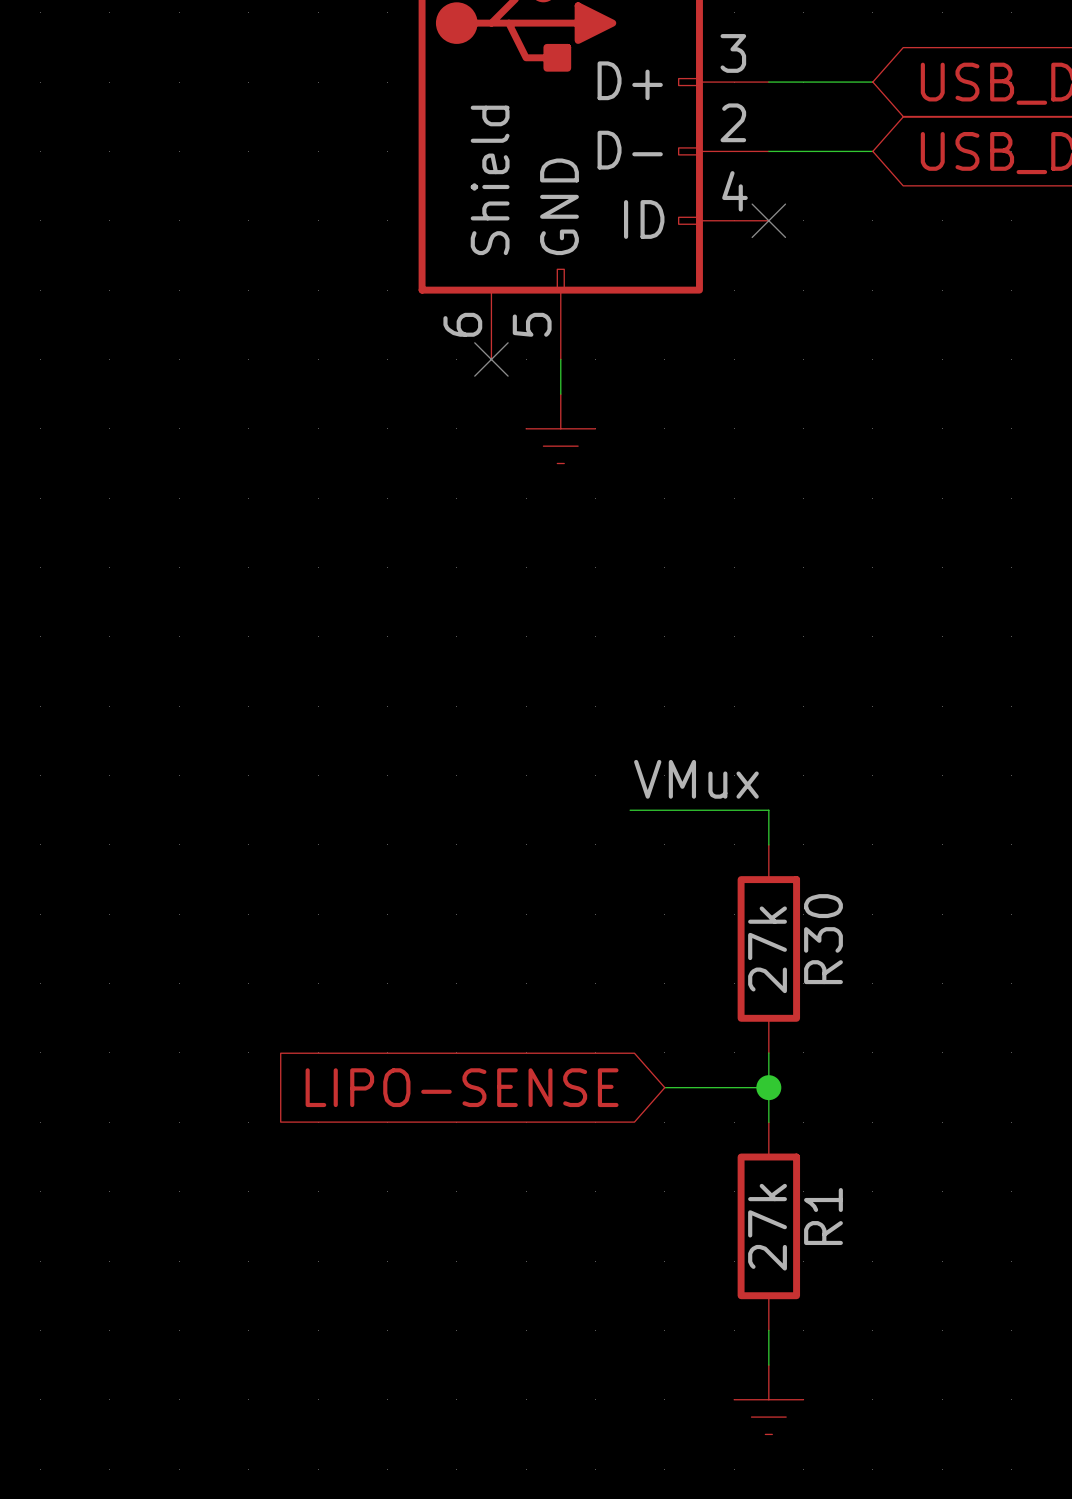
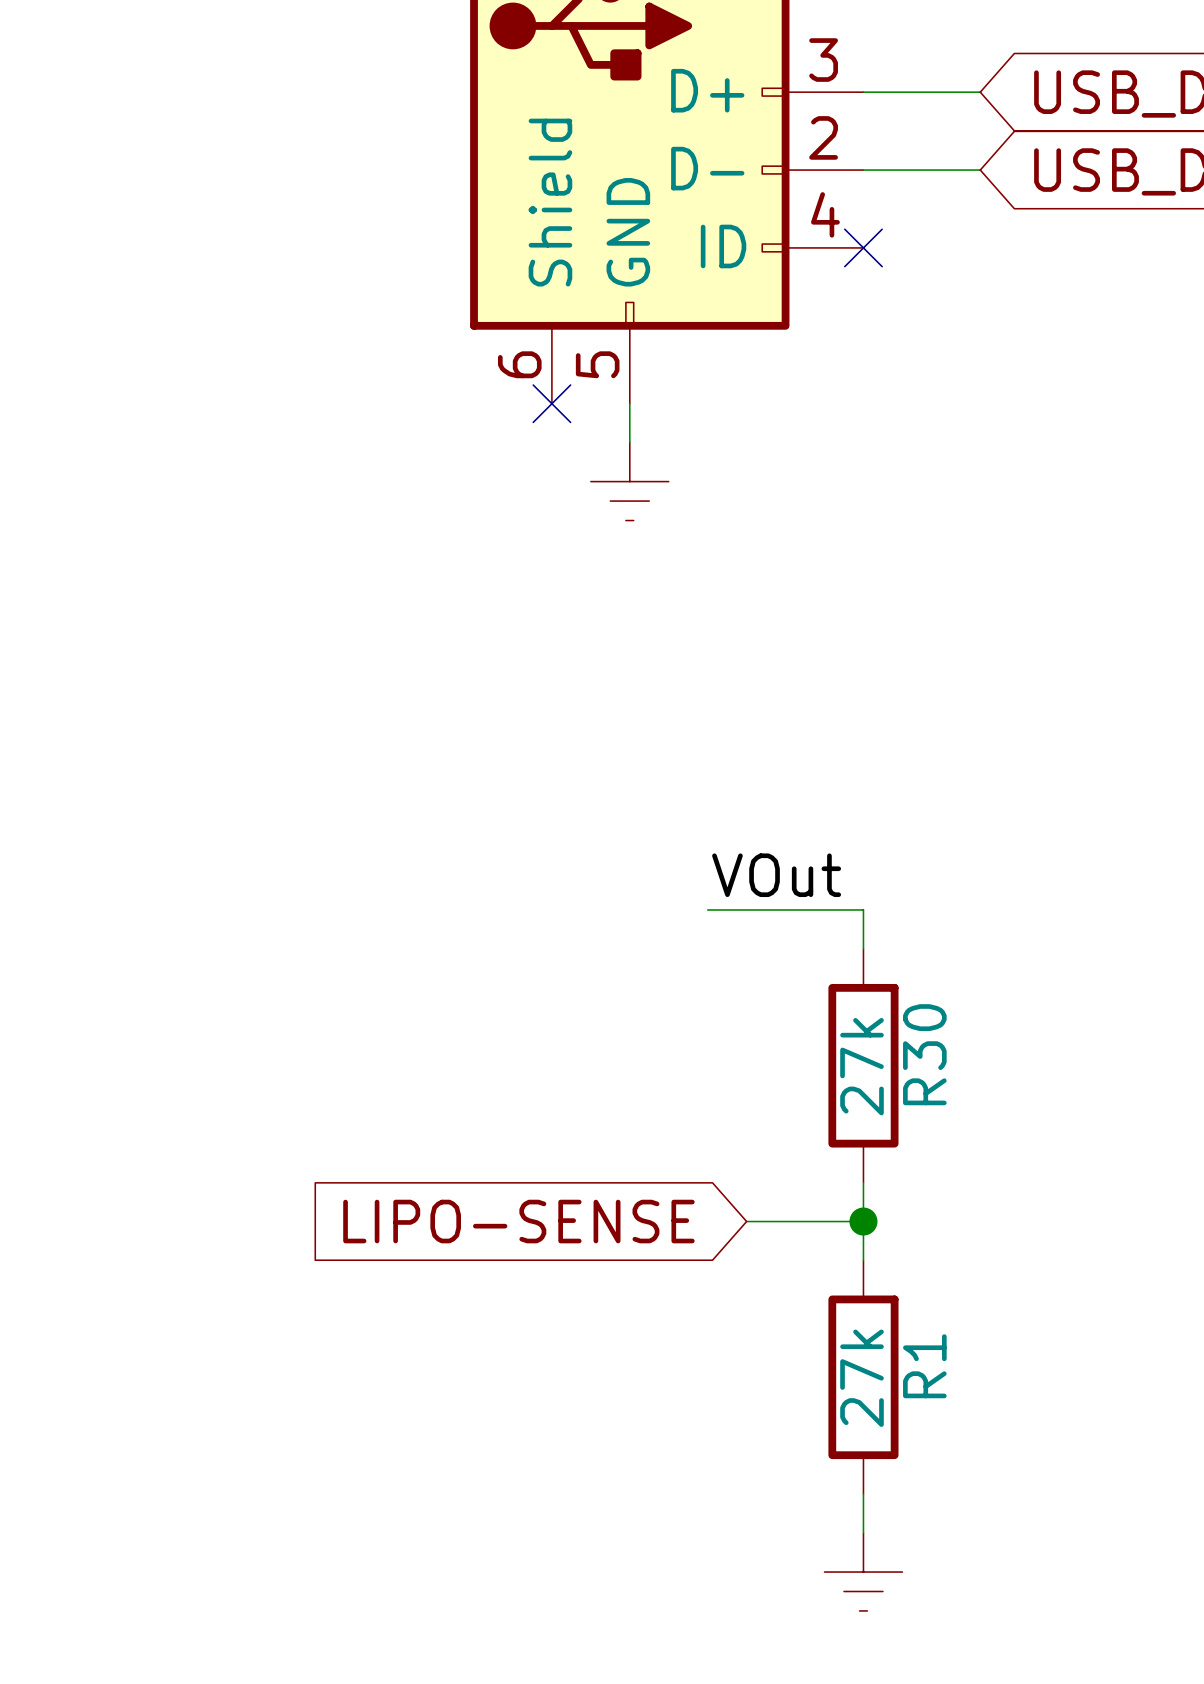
label: VMux (696, 779) -> VOut (776, 875)

